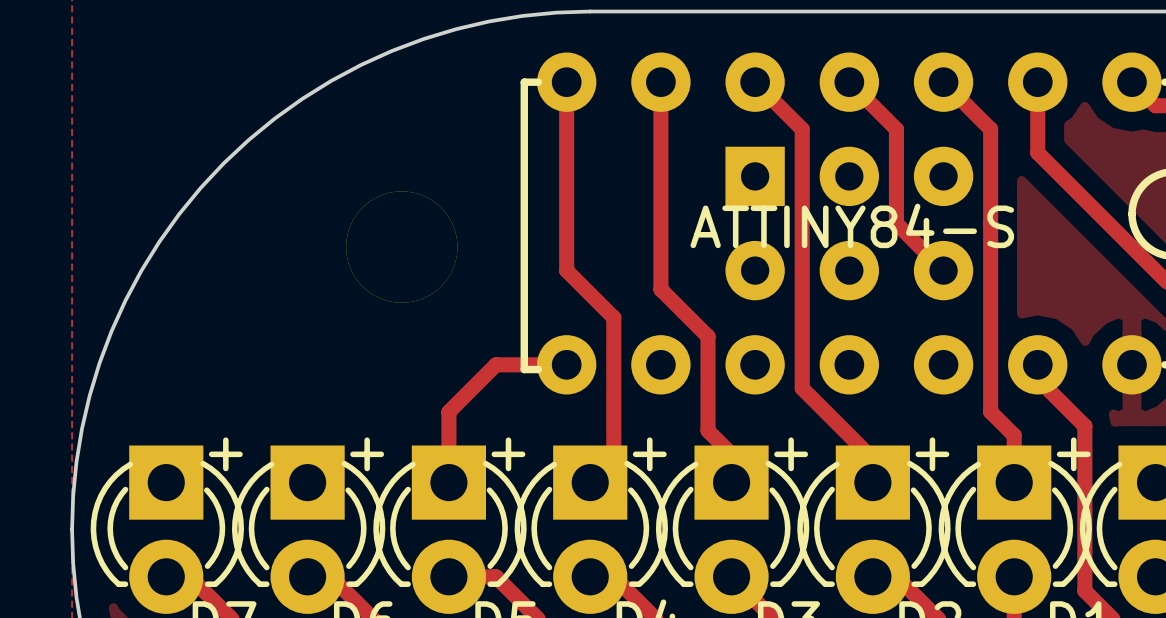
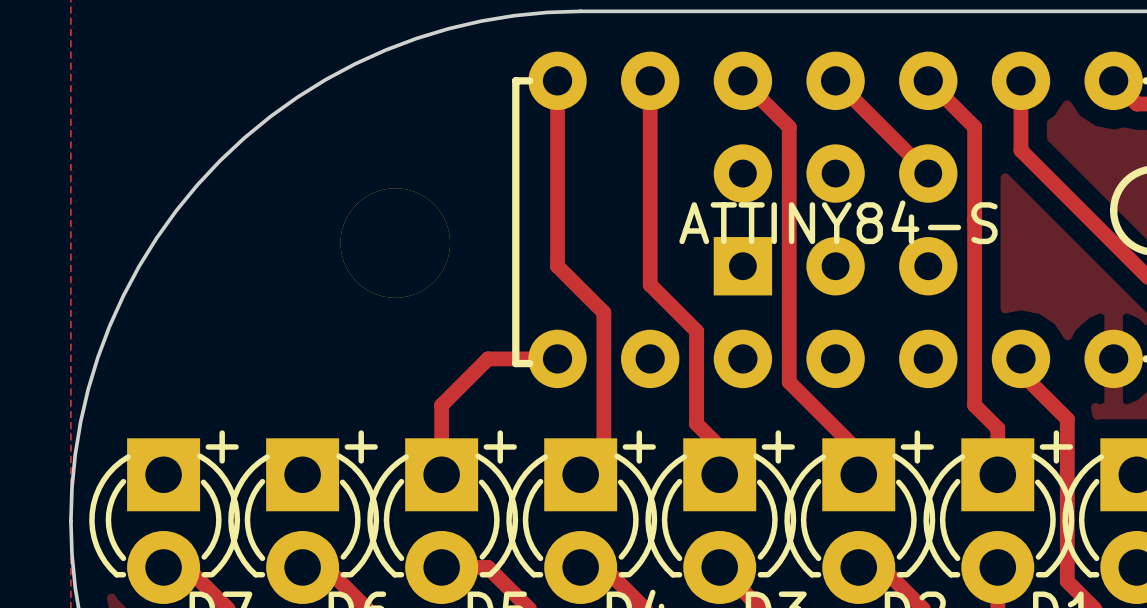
track: (896, 129) (896, 223) (943, 270) -> (881, 127) (928, 173)
part side: top (849, 223) -> bottom (835, 219)

